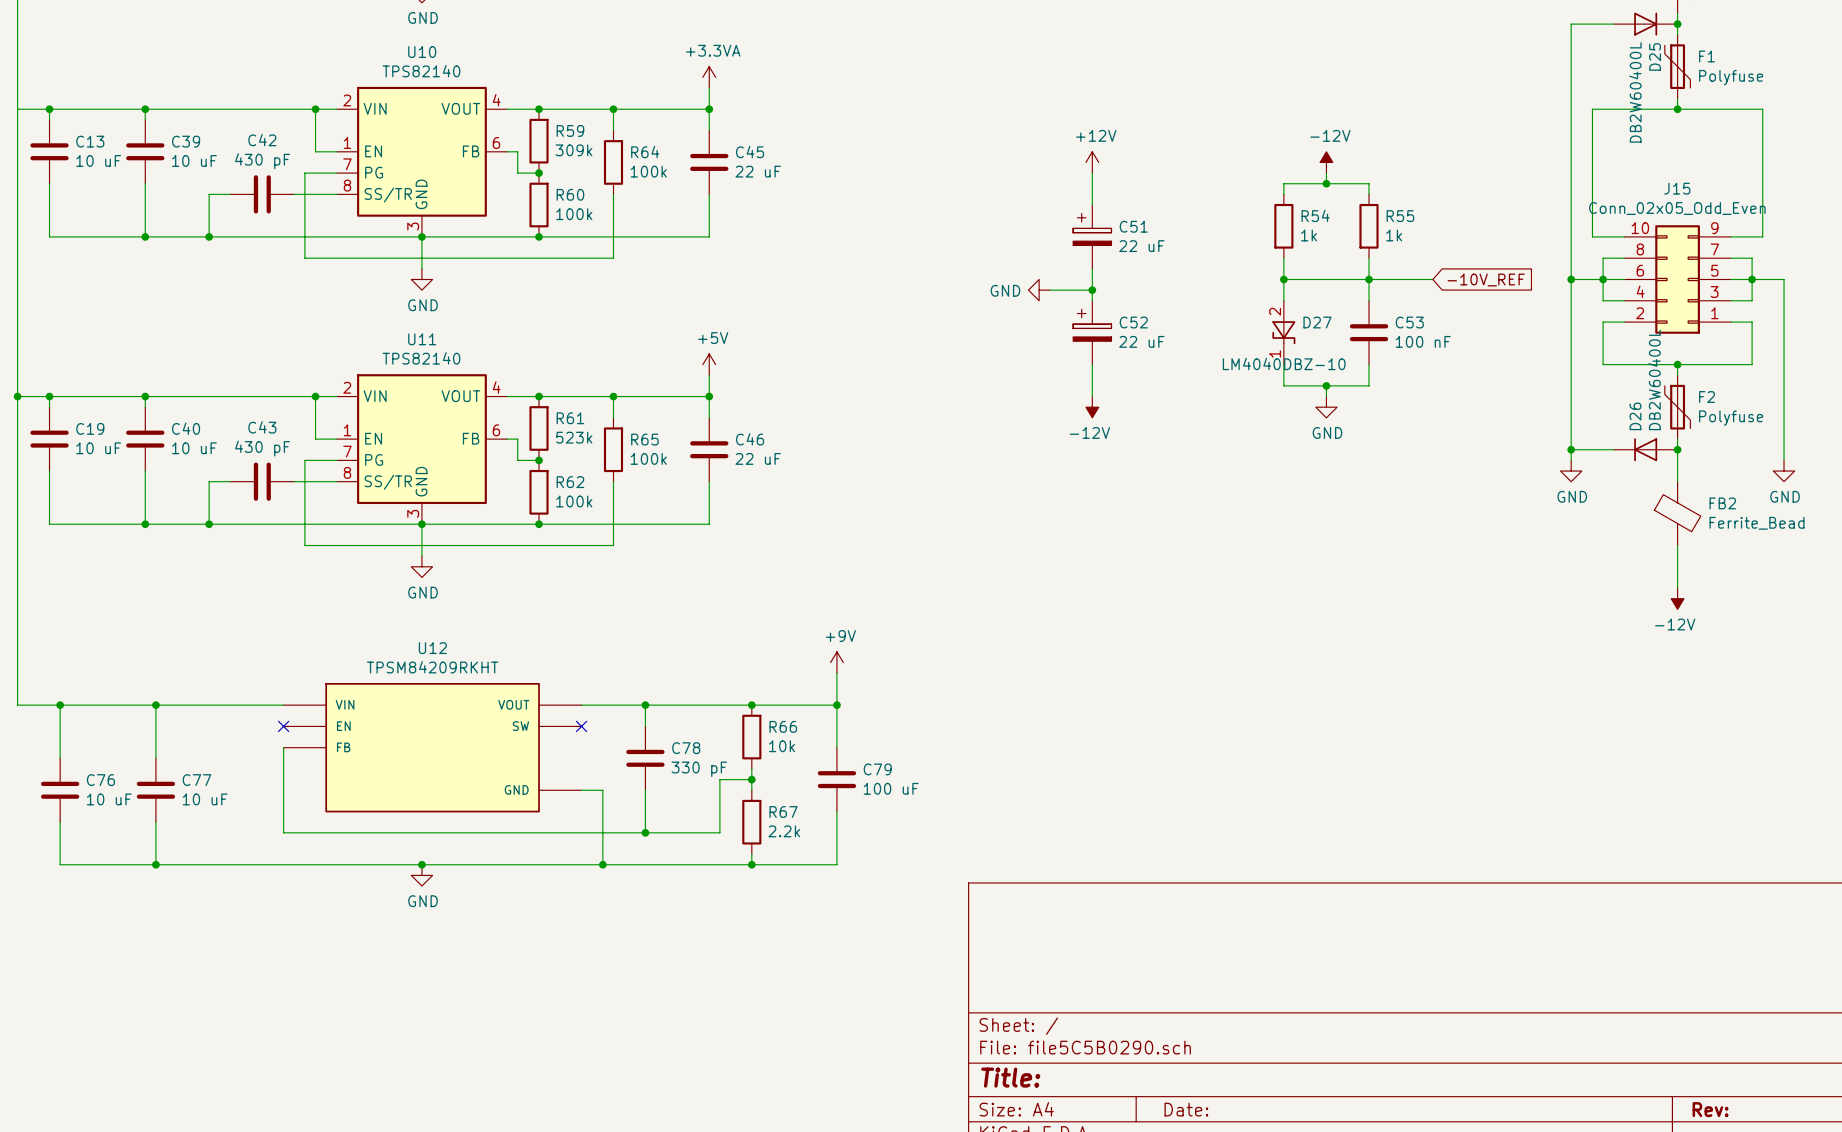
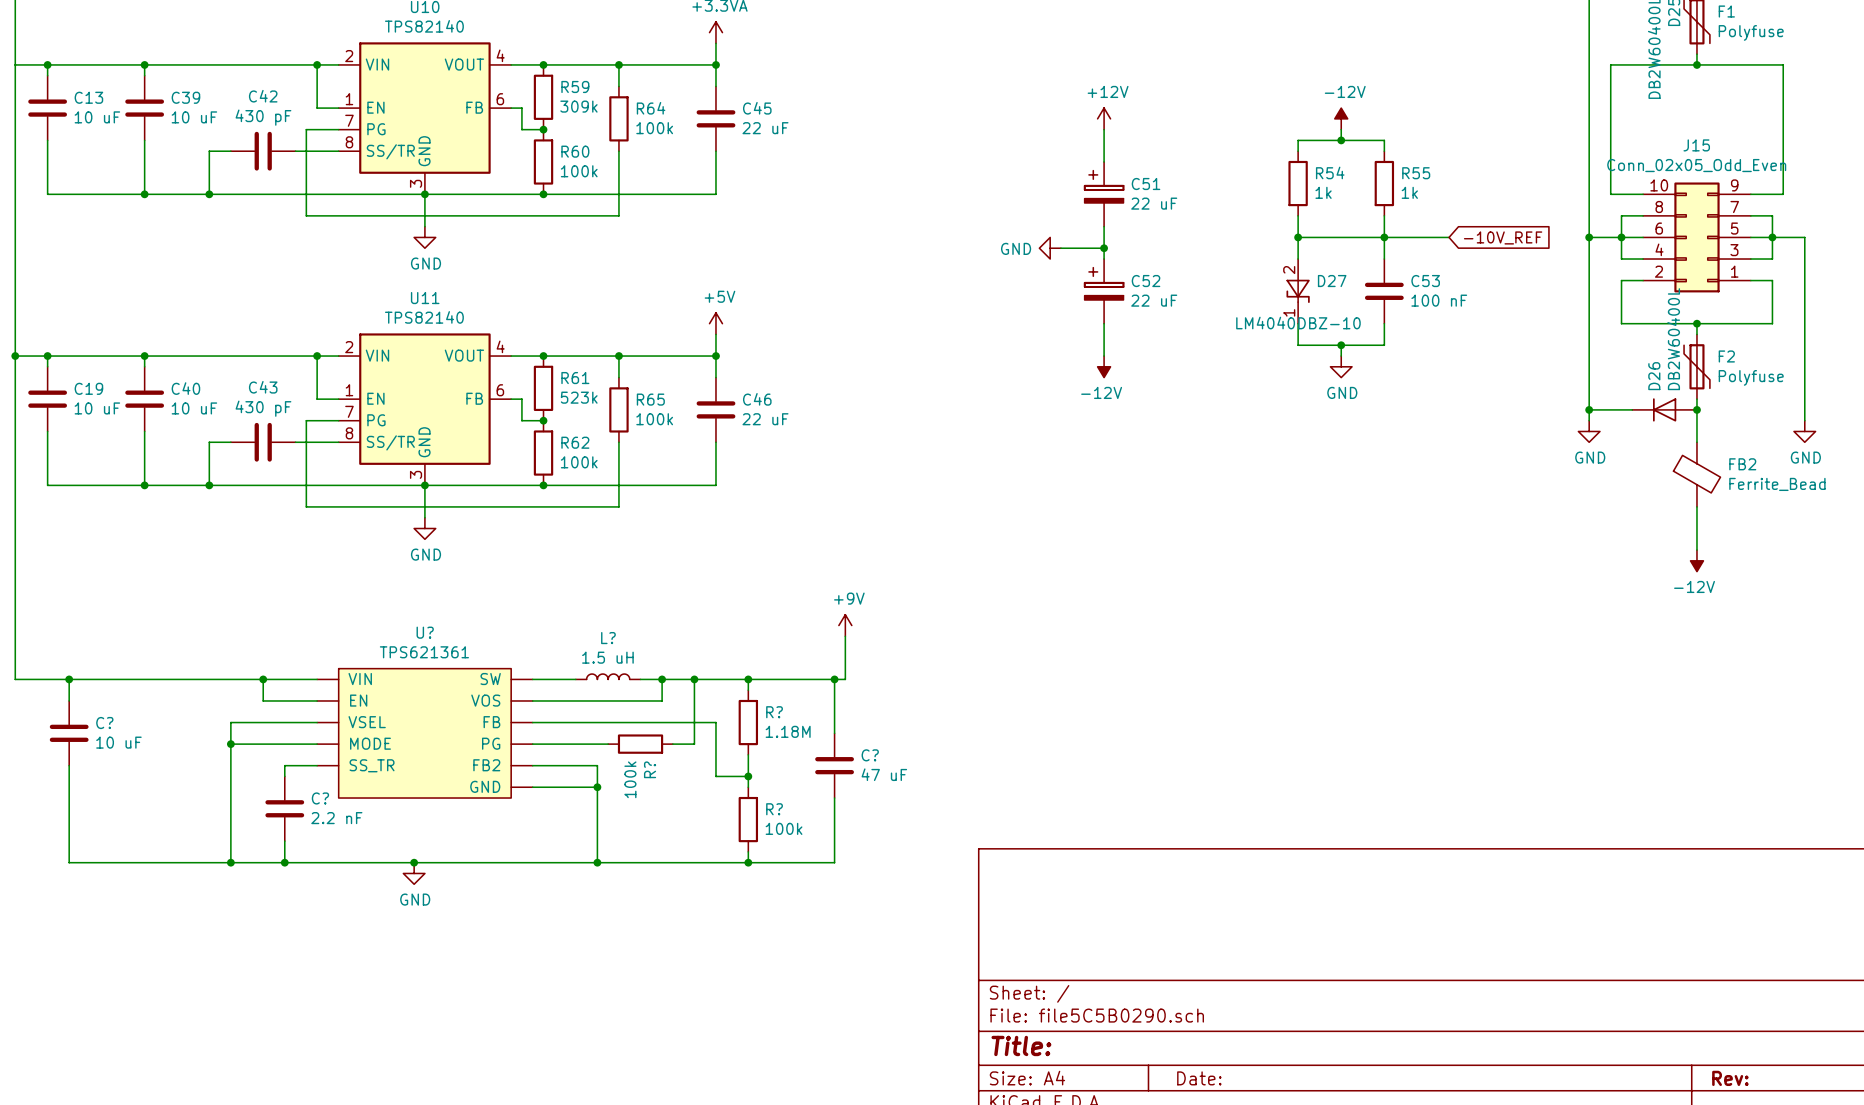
wire: (17, 705) (283, 705) -> (15, 668) (15, 679) (317, 679)
wire: (60, 705) (60, 758) -> none
junction position: (60, 705) -> (69, 679)
wire: (155, 705) (155, 758) -> none
junction: (155, 705) -> none
wire: (581, 705) (836, 705) -> none
wire: (645, 705) (645, 726) -> none
junction position: (645, 705) -> (662, 679)
junction position: (751, 705) -> (748, 679)
junction position: (836, 705) -> (834, 679)
L?: none -> 1.5 uH (608, 676)
wire: none -> (69, 679) (69, 700)
wire: none -> (263, 679) (263, 700) (317, 700)
junction: none -> (263, 679)
wire: none -> (532, 679) (575, 679)
wire: none -> (662, 679) (662, 700) (532, 700)
wire: none -> (694, 679) (694, 744) (672, 744)
junction: none -> (694, 679)
wire: none -> (748, 679) (748, 690)
wire: none -> (834, 679) (834, 733)
wire: (836, 715) (836, 747) -> (845, 679) (640, 679)
no-connect mark: (283, 726) -> none
no-connect mark: (581, 726) -> none
R66: 10k (751, 737) -> none
wire: (283, 747) (283, 800) -> (317, 765) (284, 765)
U12: TPSM84209RKHT (432, 747) -> none
wire: none -> (317, 722) (230, 722) (230, 862)
wire: none -> (532, 722) (715, 722) (715, 776) (748, 776)
C78: 330 pF (645, 758) -> none
R?: none -> 1.18M (748, 722)
C?: none -> 10 uF (69, 733)
U?: none -> TPS621361 (424, 733)
wire: (751, 768) (751, 790) -> none
wire: none -> (230, 744) (317, 744)
junction: none -> (230, 744)
wire: none -> (532, 744) (608, 744)
R?: none -> 100k (640, 744)
wire: (751, 779) (719, 779) (719, 832) (283, 832) (283, 811) -> none
junction: (751, 779) -> none
C79: 100 uF (836, 779) -> none
C76: 10 uF (60, 790) -> none
C77: 10 uF (155, 790) -> none
wire: (581, 790) (602, 790) (602, 864) -> none
wire: (645, 790) (645, 832) -> none
wire: none -> (748, 754) (748, 787)
wire: none -> (69, 765) (69, 862) (834, 862) (834, 798)
wire: none -> (532, 765) (597, 765) (597, 862)
C?: none -> 47 uF (834, 765)
junction: none -> (748, 776)
wire: (836, 811) (836, 864) (60, 864) (60, 822) -> none
wire: (155, 822) (155, 864) -> none
wire: none -> (532, 787) (597, 787)
junction: none -> (597, 787)
R67: 2.2k (751, 822) -> none
junction: (645, 832) -> none
C?: none -> 2.2 nF (284, 808)
R?: none -> 100k (748, 819)
wire: (751, 854) (751, 864) -> (748, 851) (748, 862)
junction: (155, 864) -> none
junction position: (421, 864) -> (414, 862)
junction: (602, 864) -> none
junction: (751, 864) -> none
wire: none -> (284, 841) (284, 862)
power symbol position: GND (421, 875) -> GND (414, 873)
junction: none -> (230, 862)
junction: none -> (284, 862)
junction: none -> (597, 862)
junction: none -> (748, 862)

